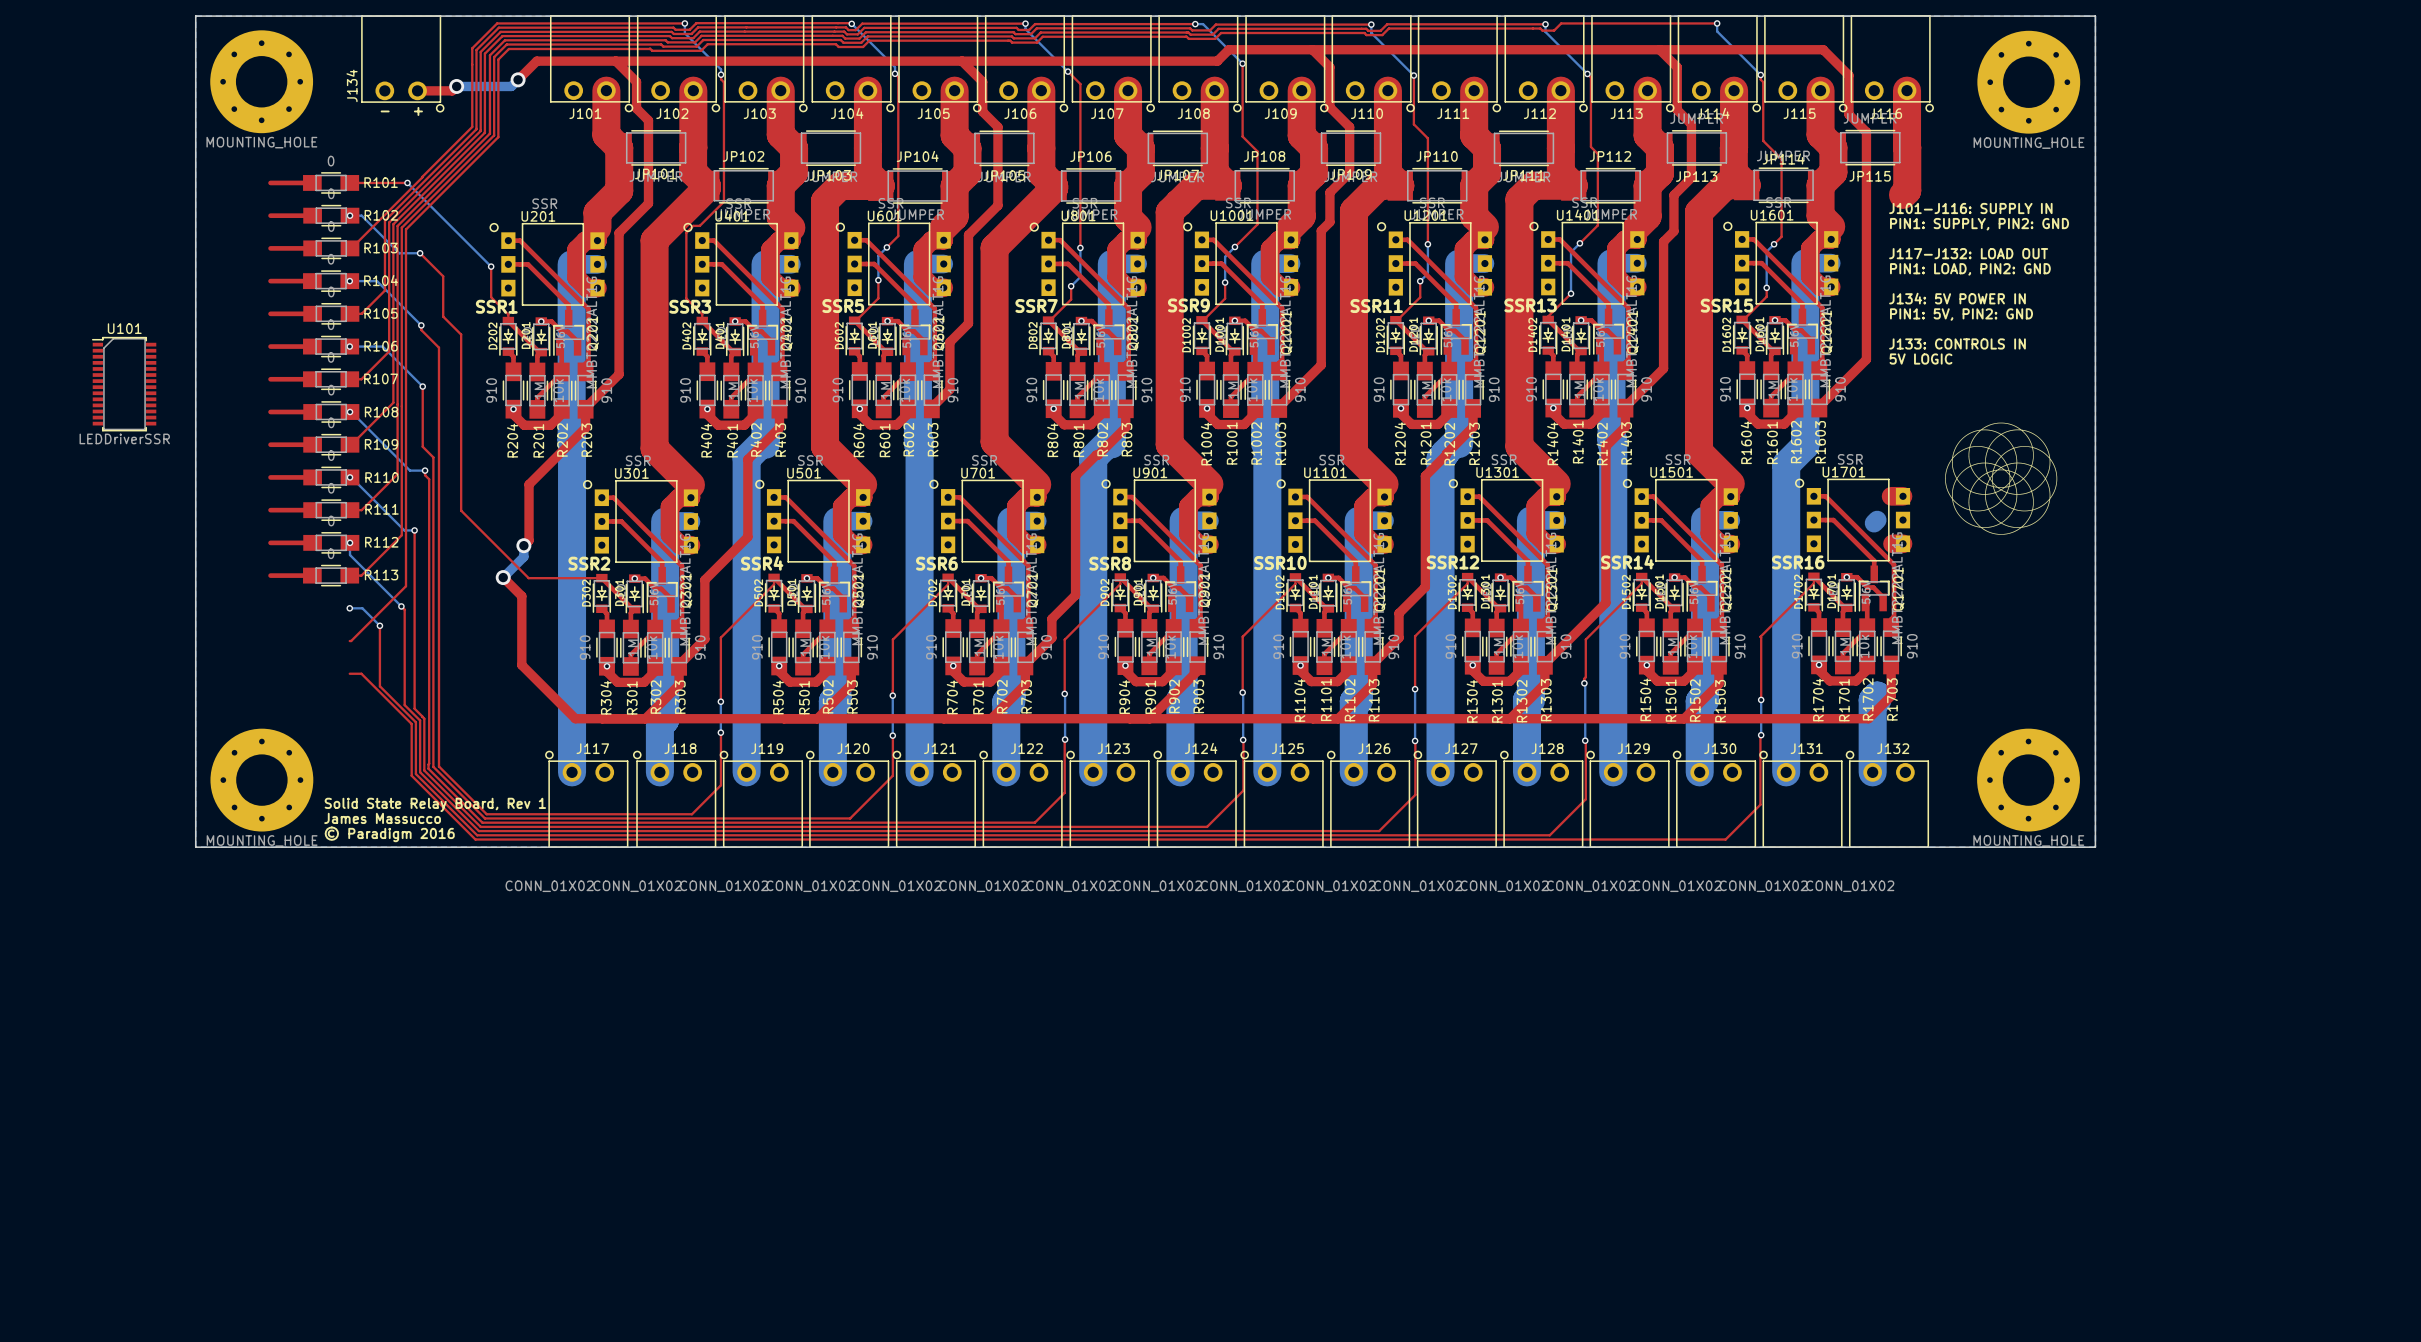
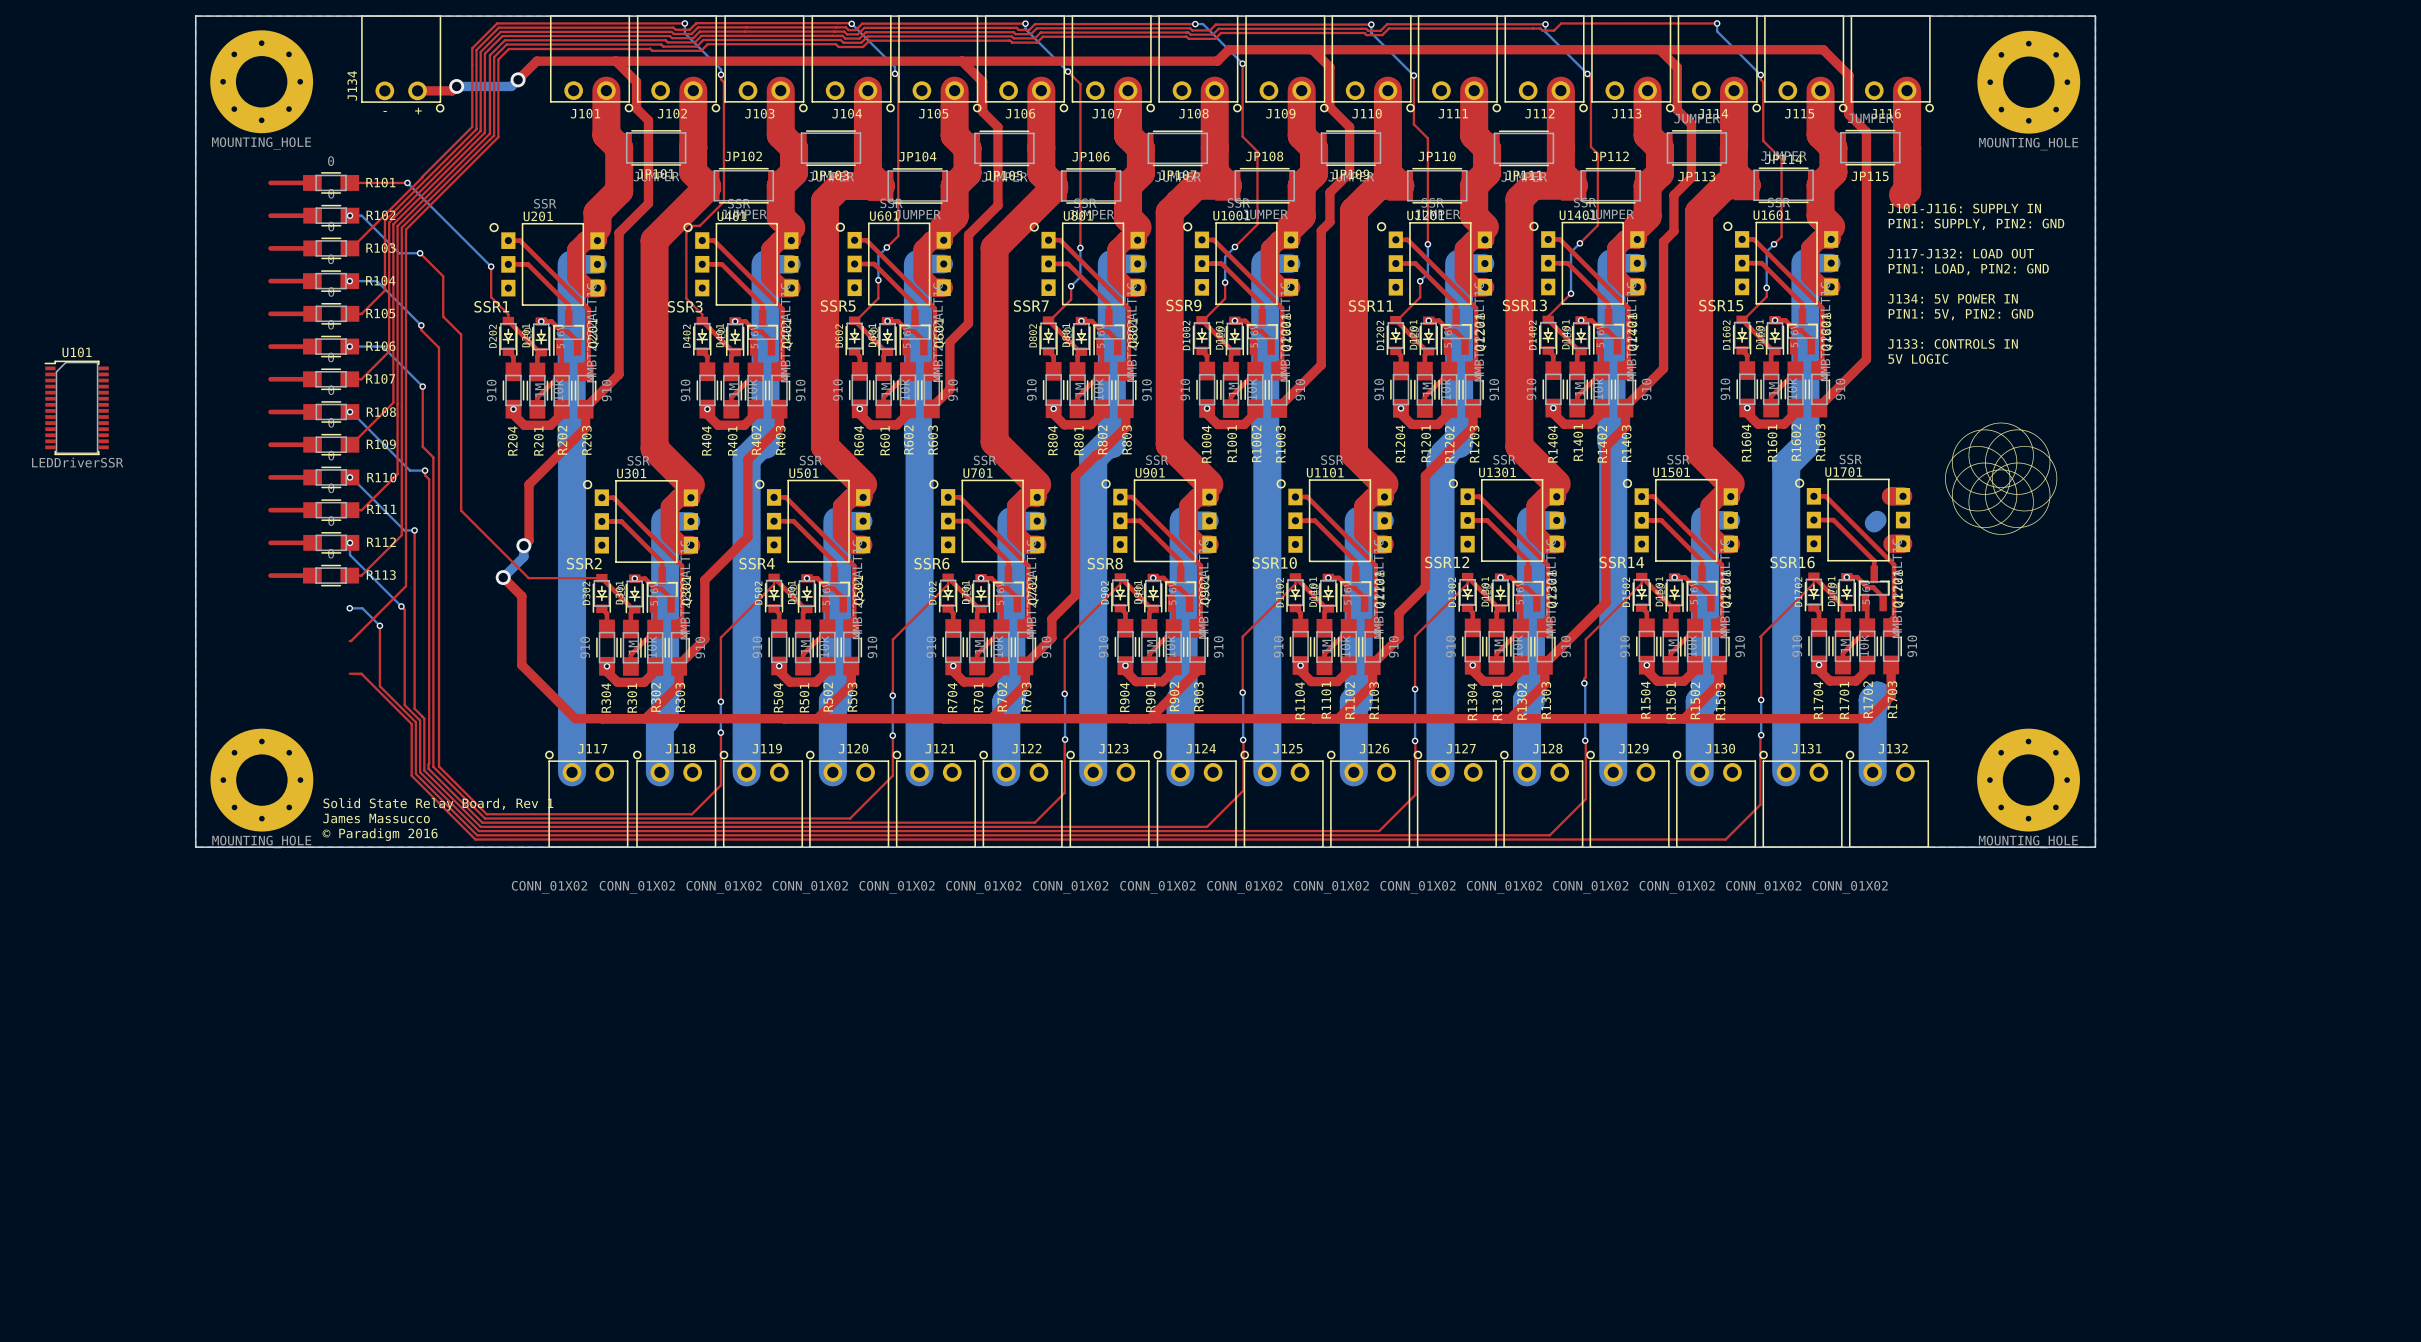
U101 position: (124, 384) -> (76, 407)

